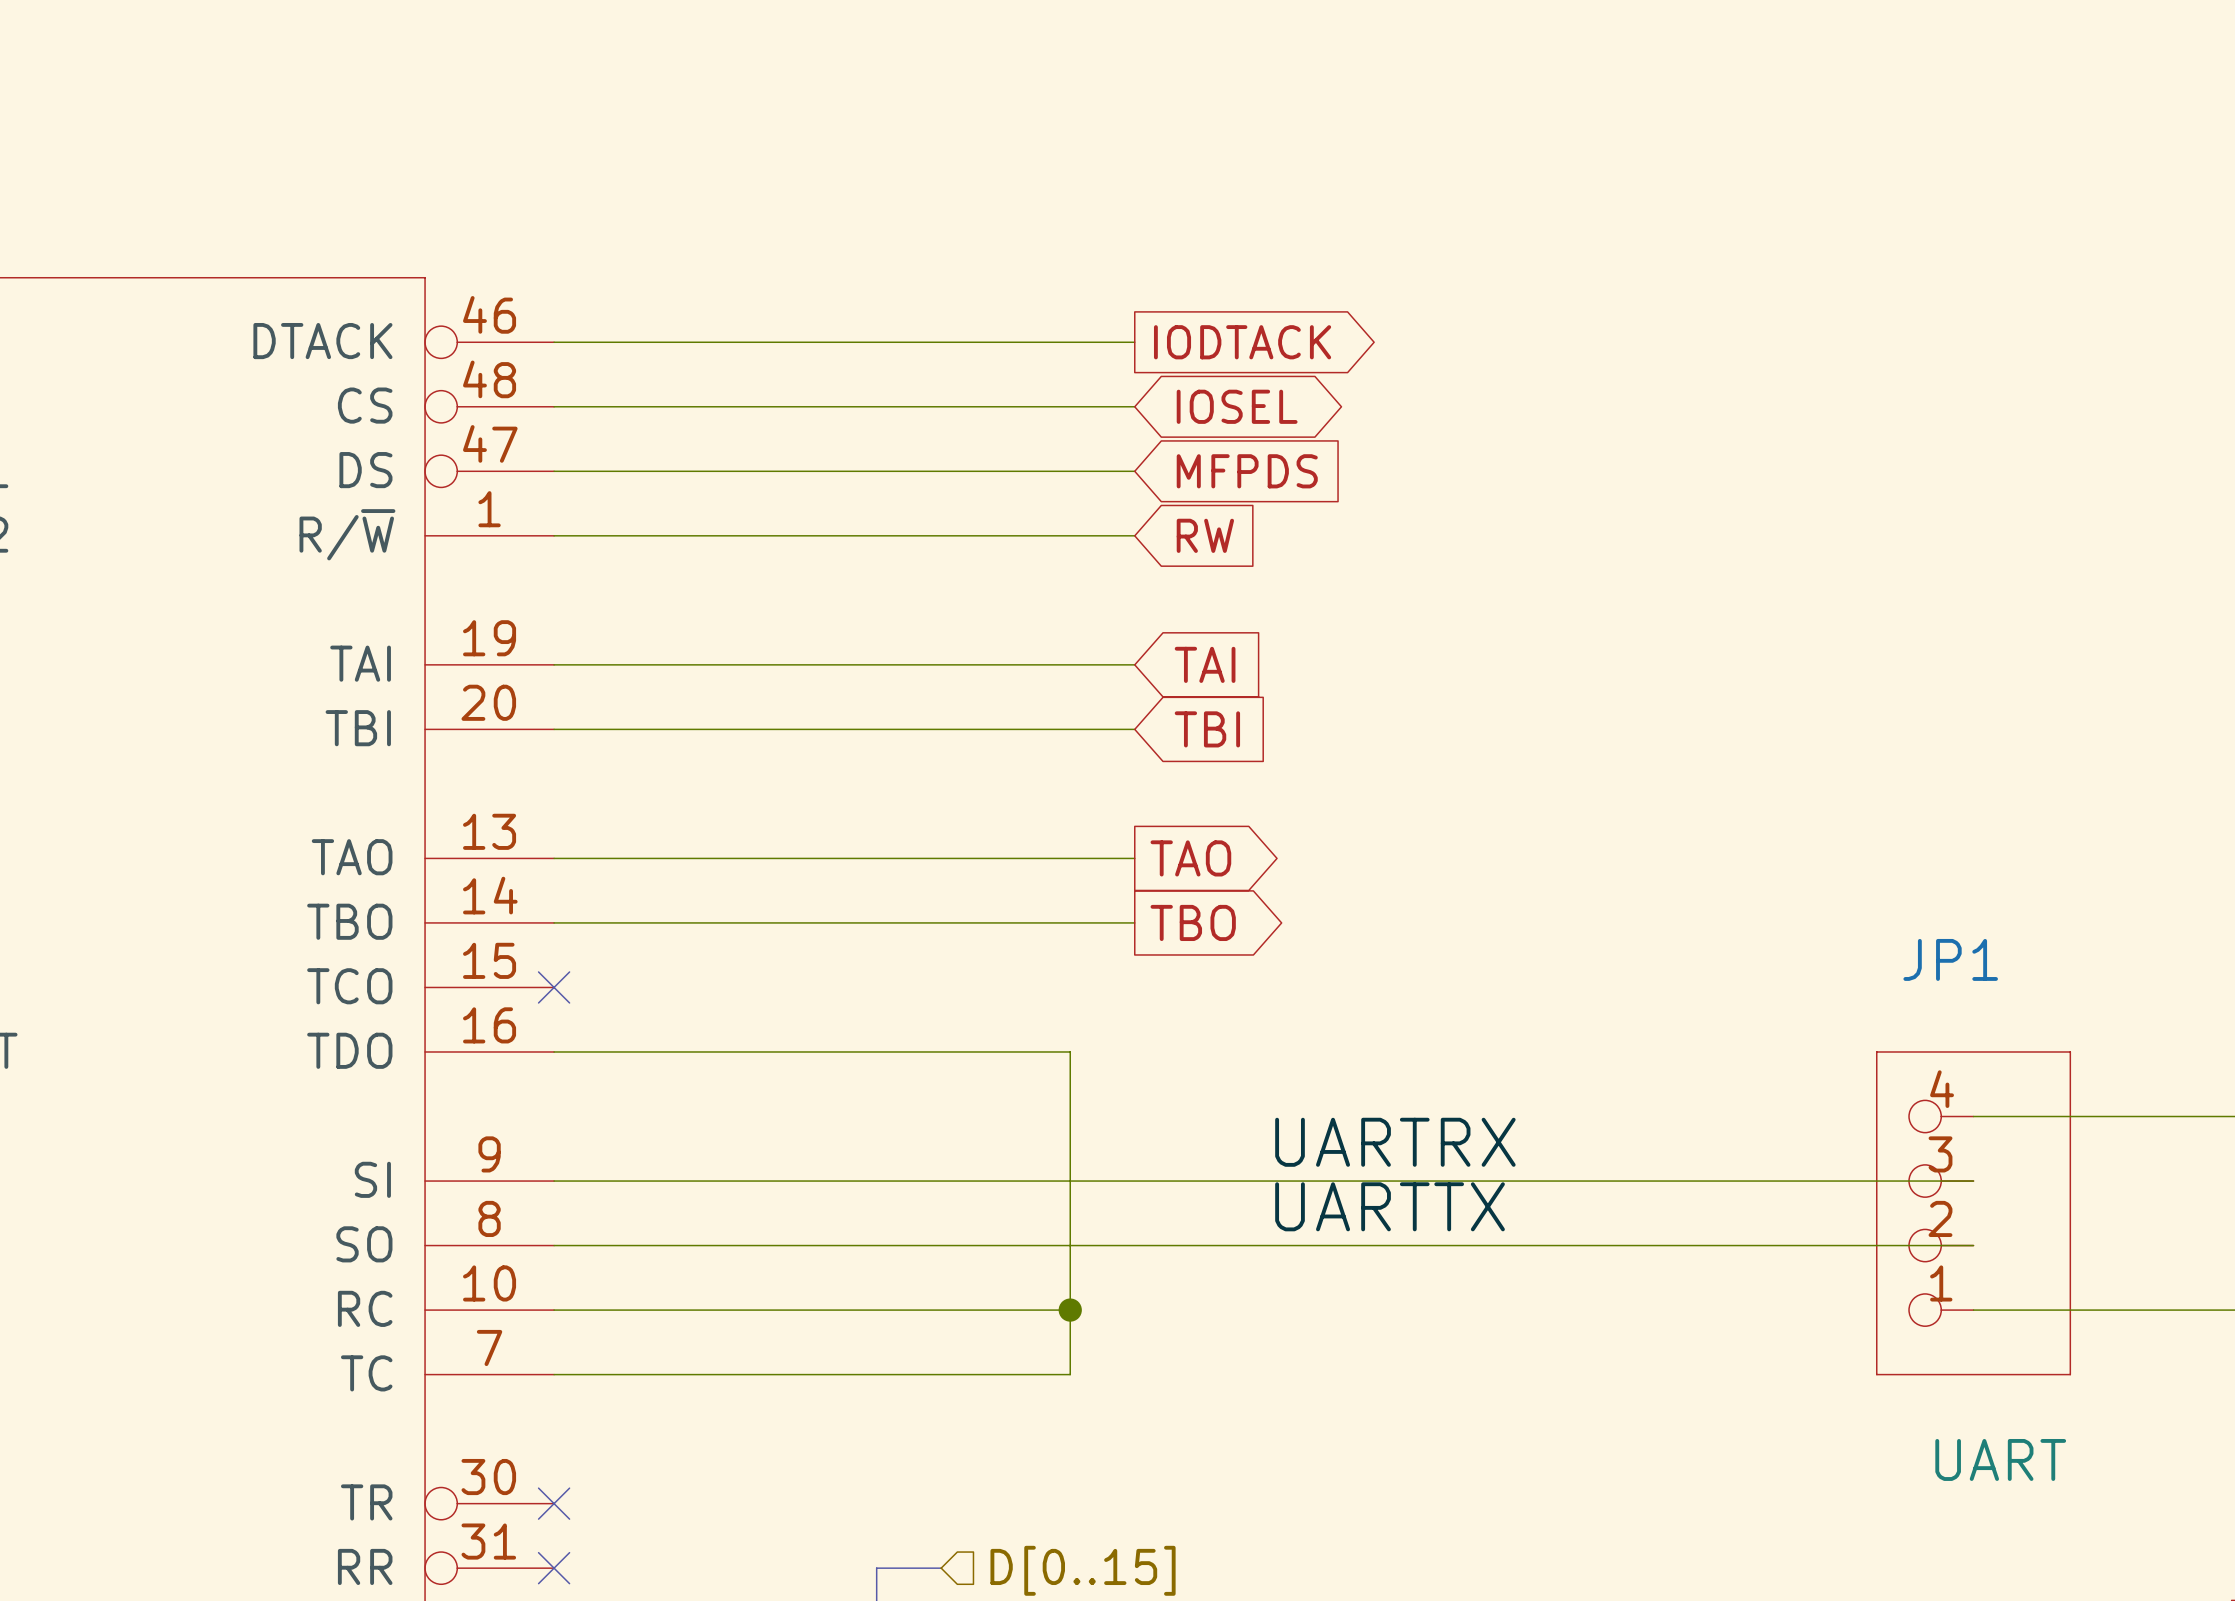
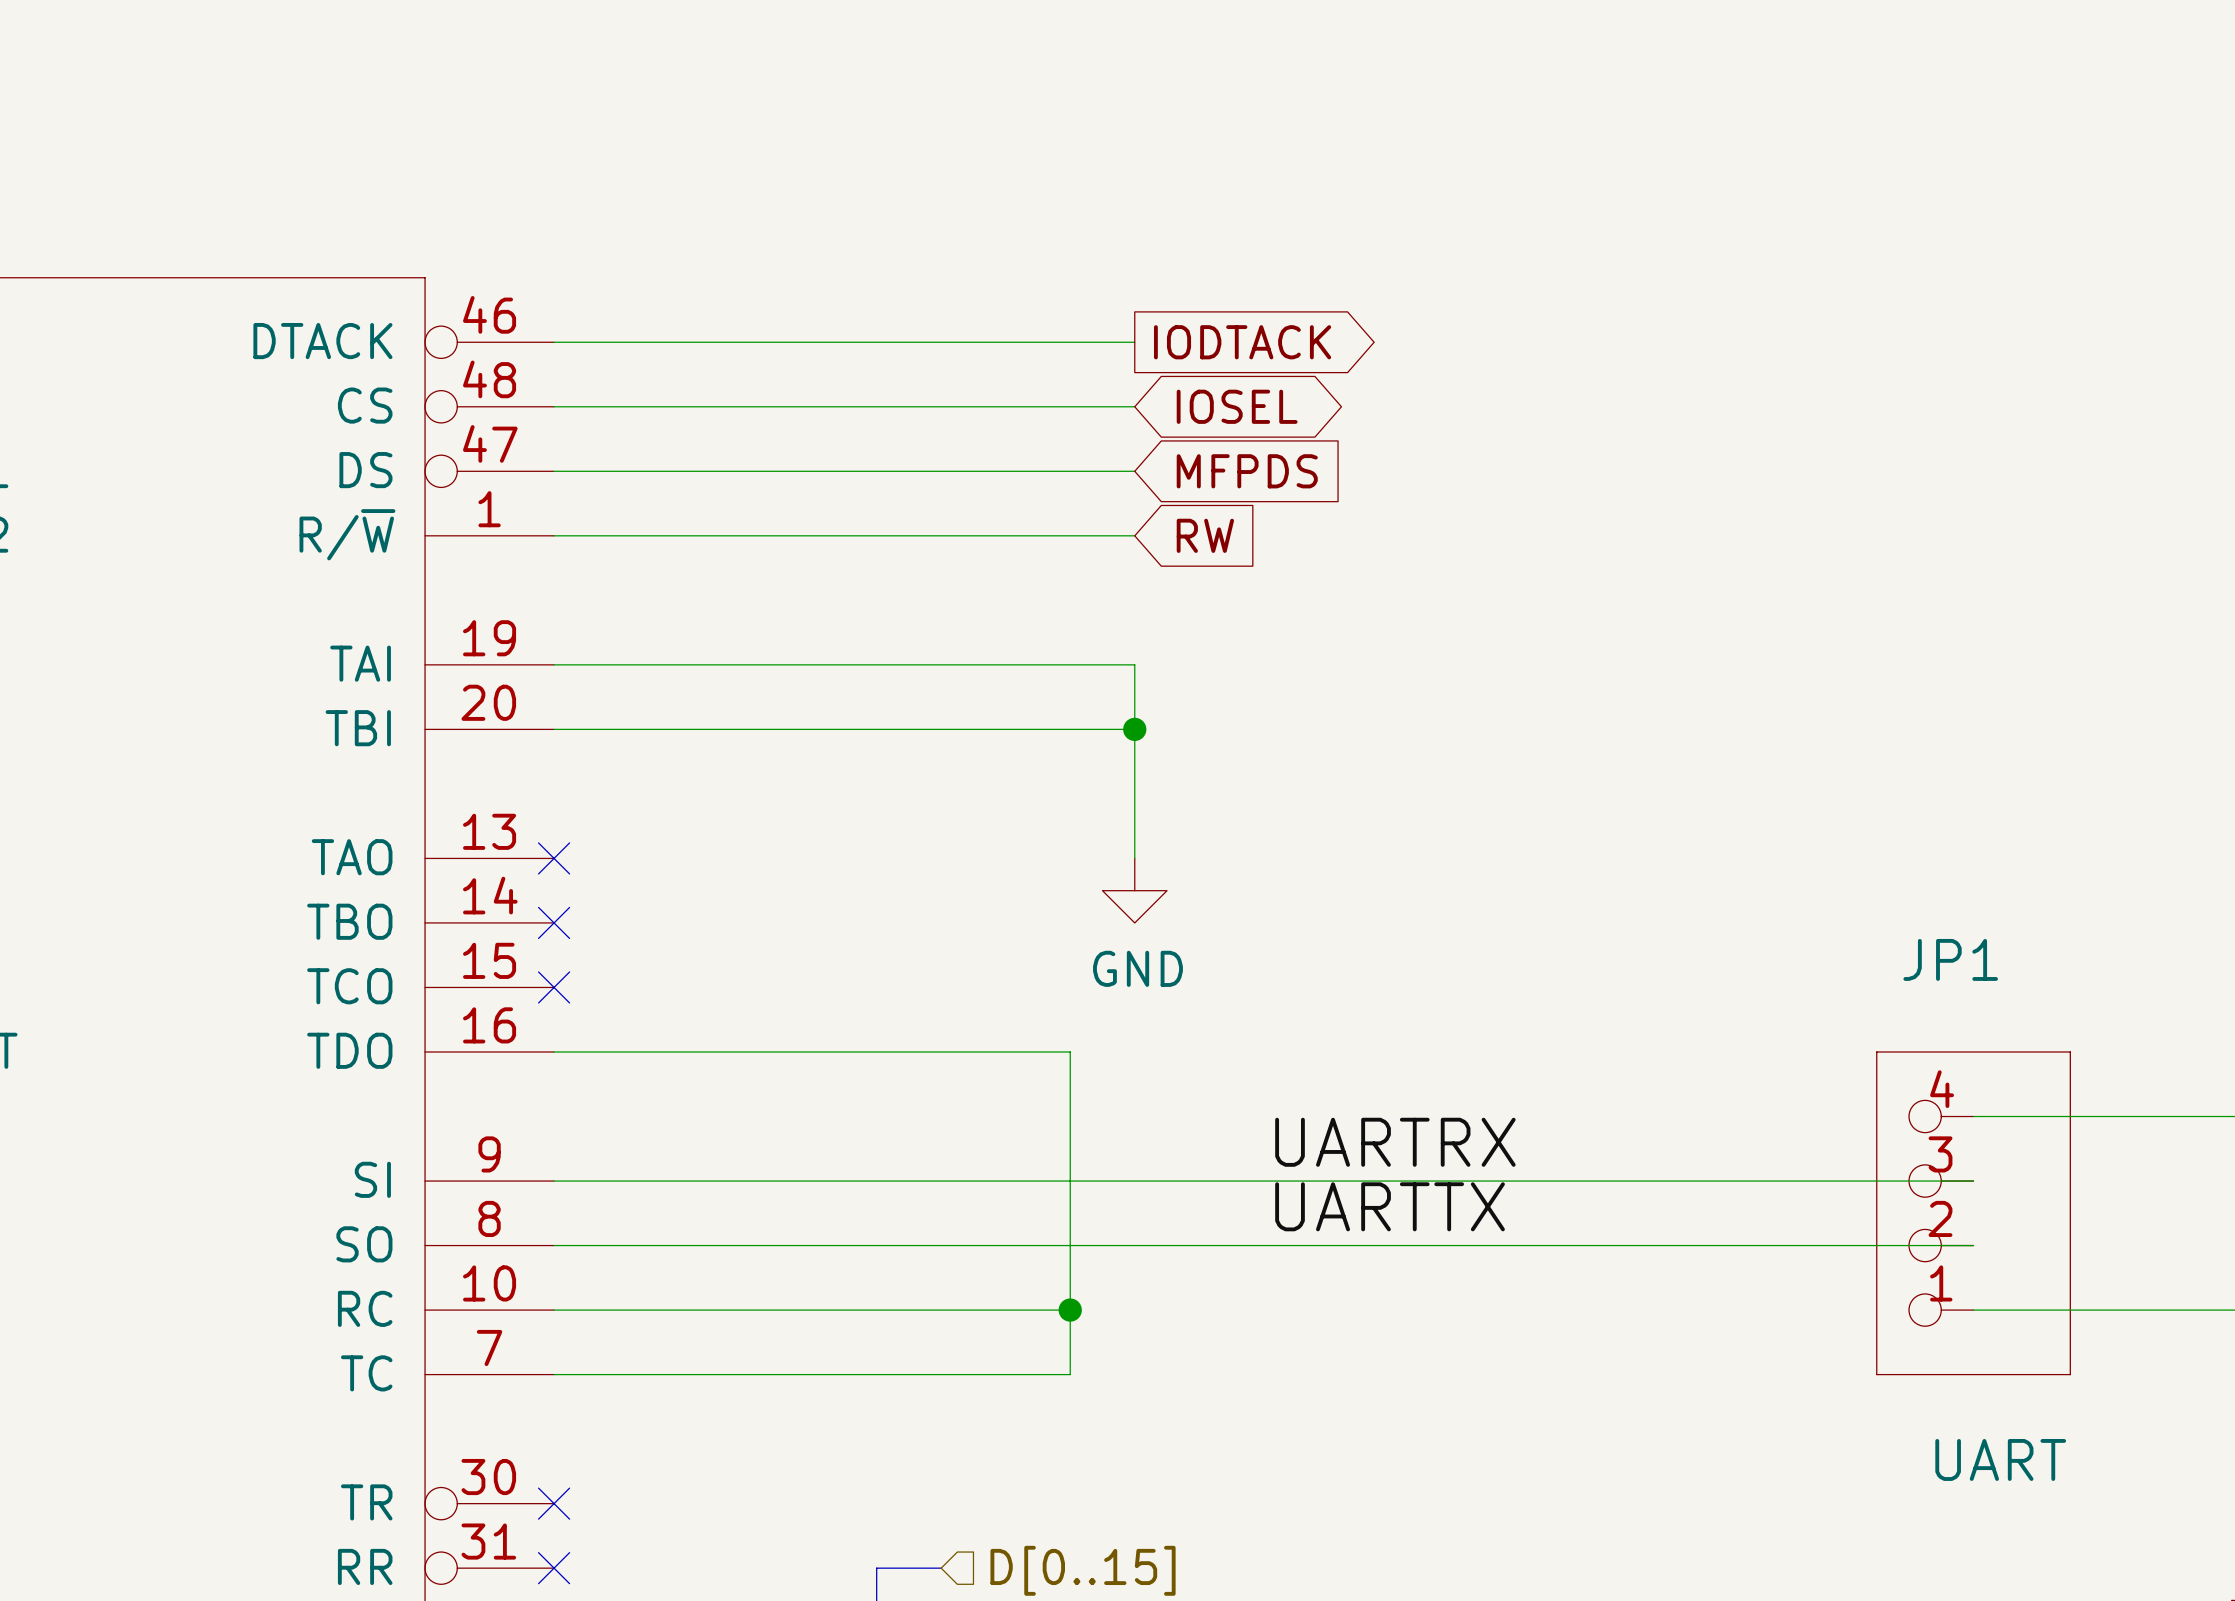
global label: TAI (1205, 664) -> none
junction: none -> (1134, 729)
global label: TBI (1207, 729) -> none
wire: (554, 858) (1134, 858) -> (1134, 664) (1134, 858)
no-connect mark: none -> (554, 858)
global label: TAO (1190, 858) -> none
power symbol: none -> GND (1134, 890)
wire: (554, 922) (1134, 922) -> none
no-connect mark: none -> (554, 922)
global label: TBO (1193, 922) -> none

